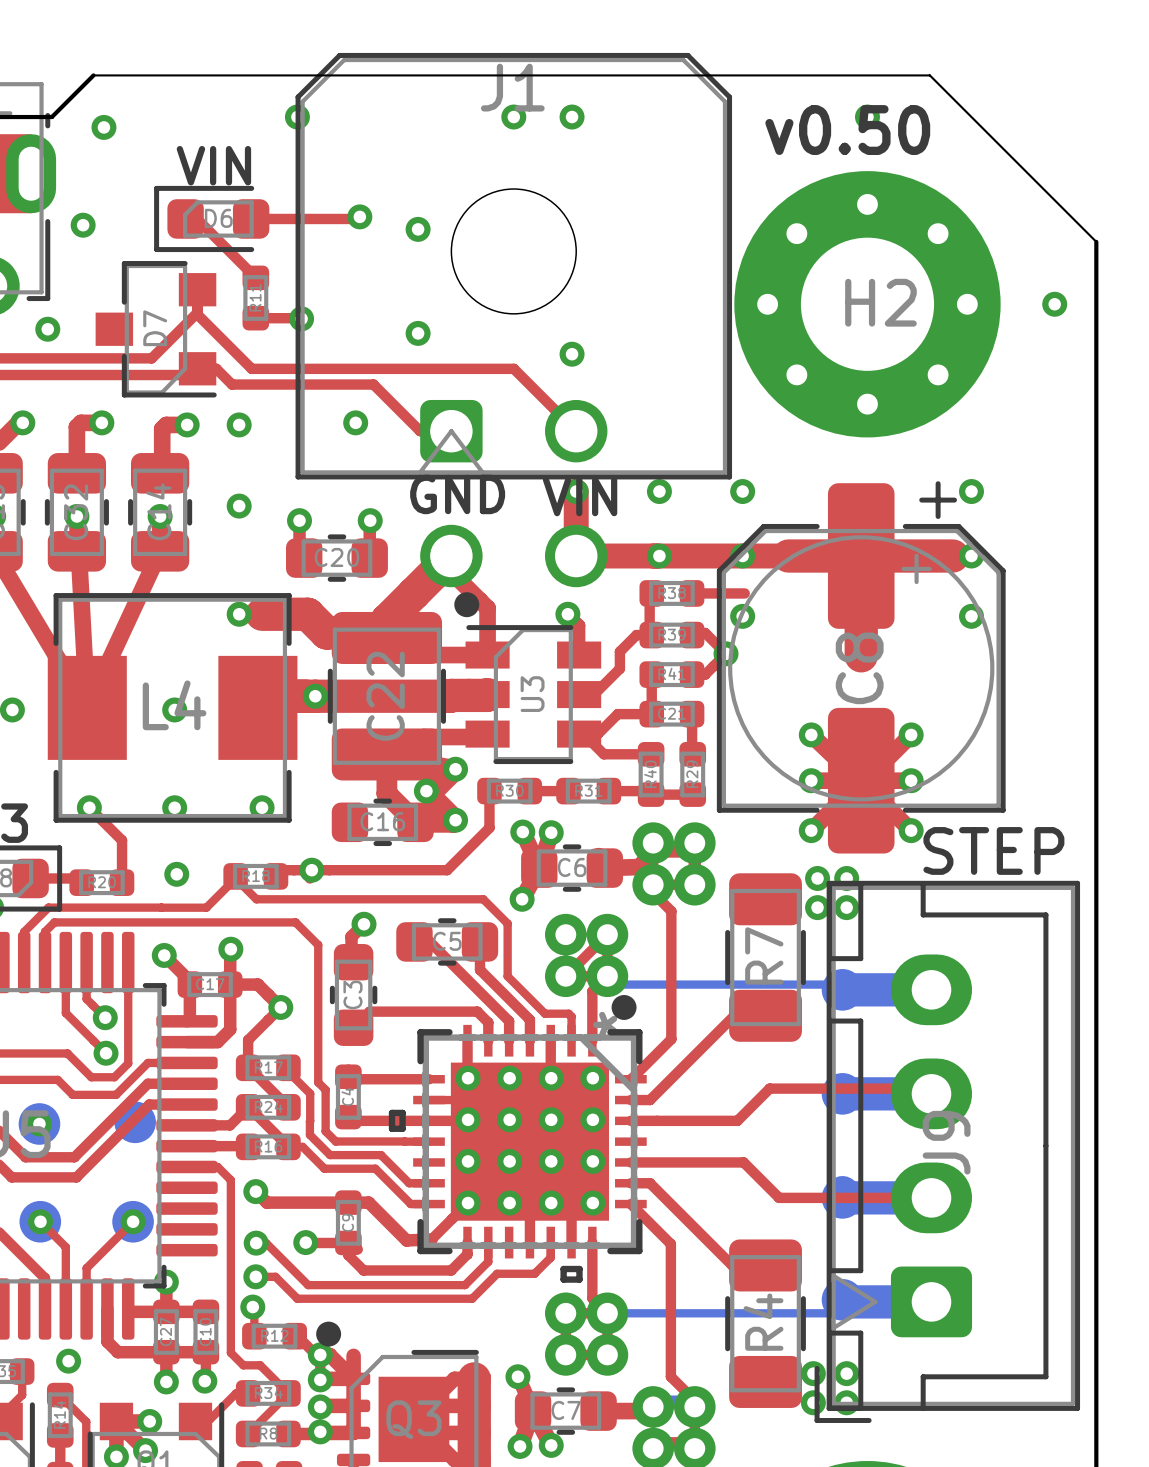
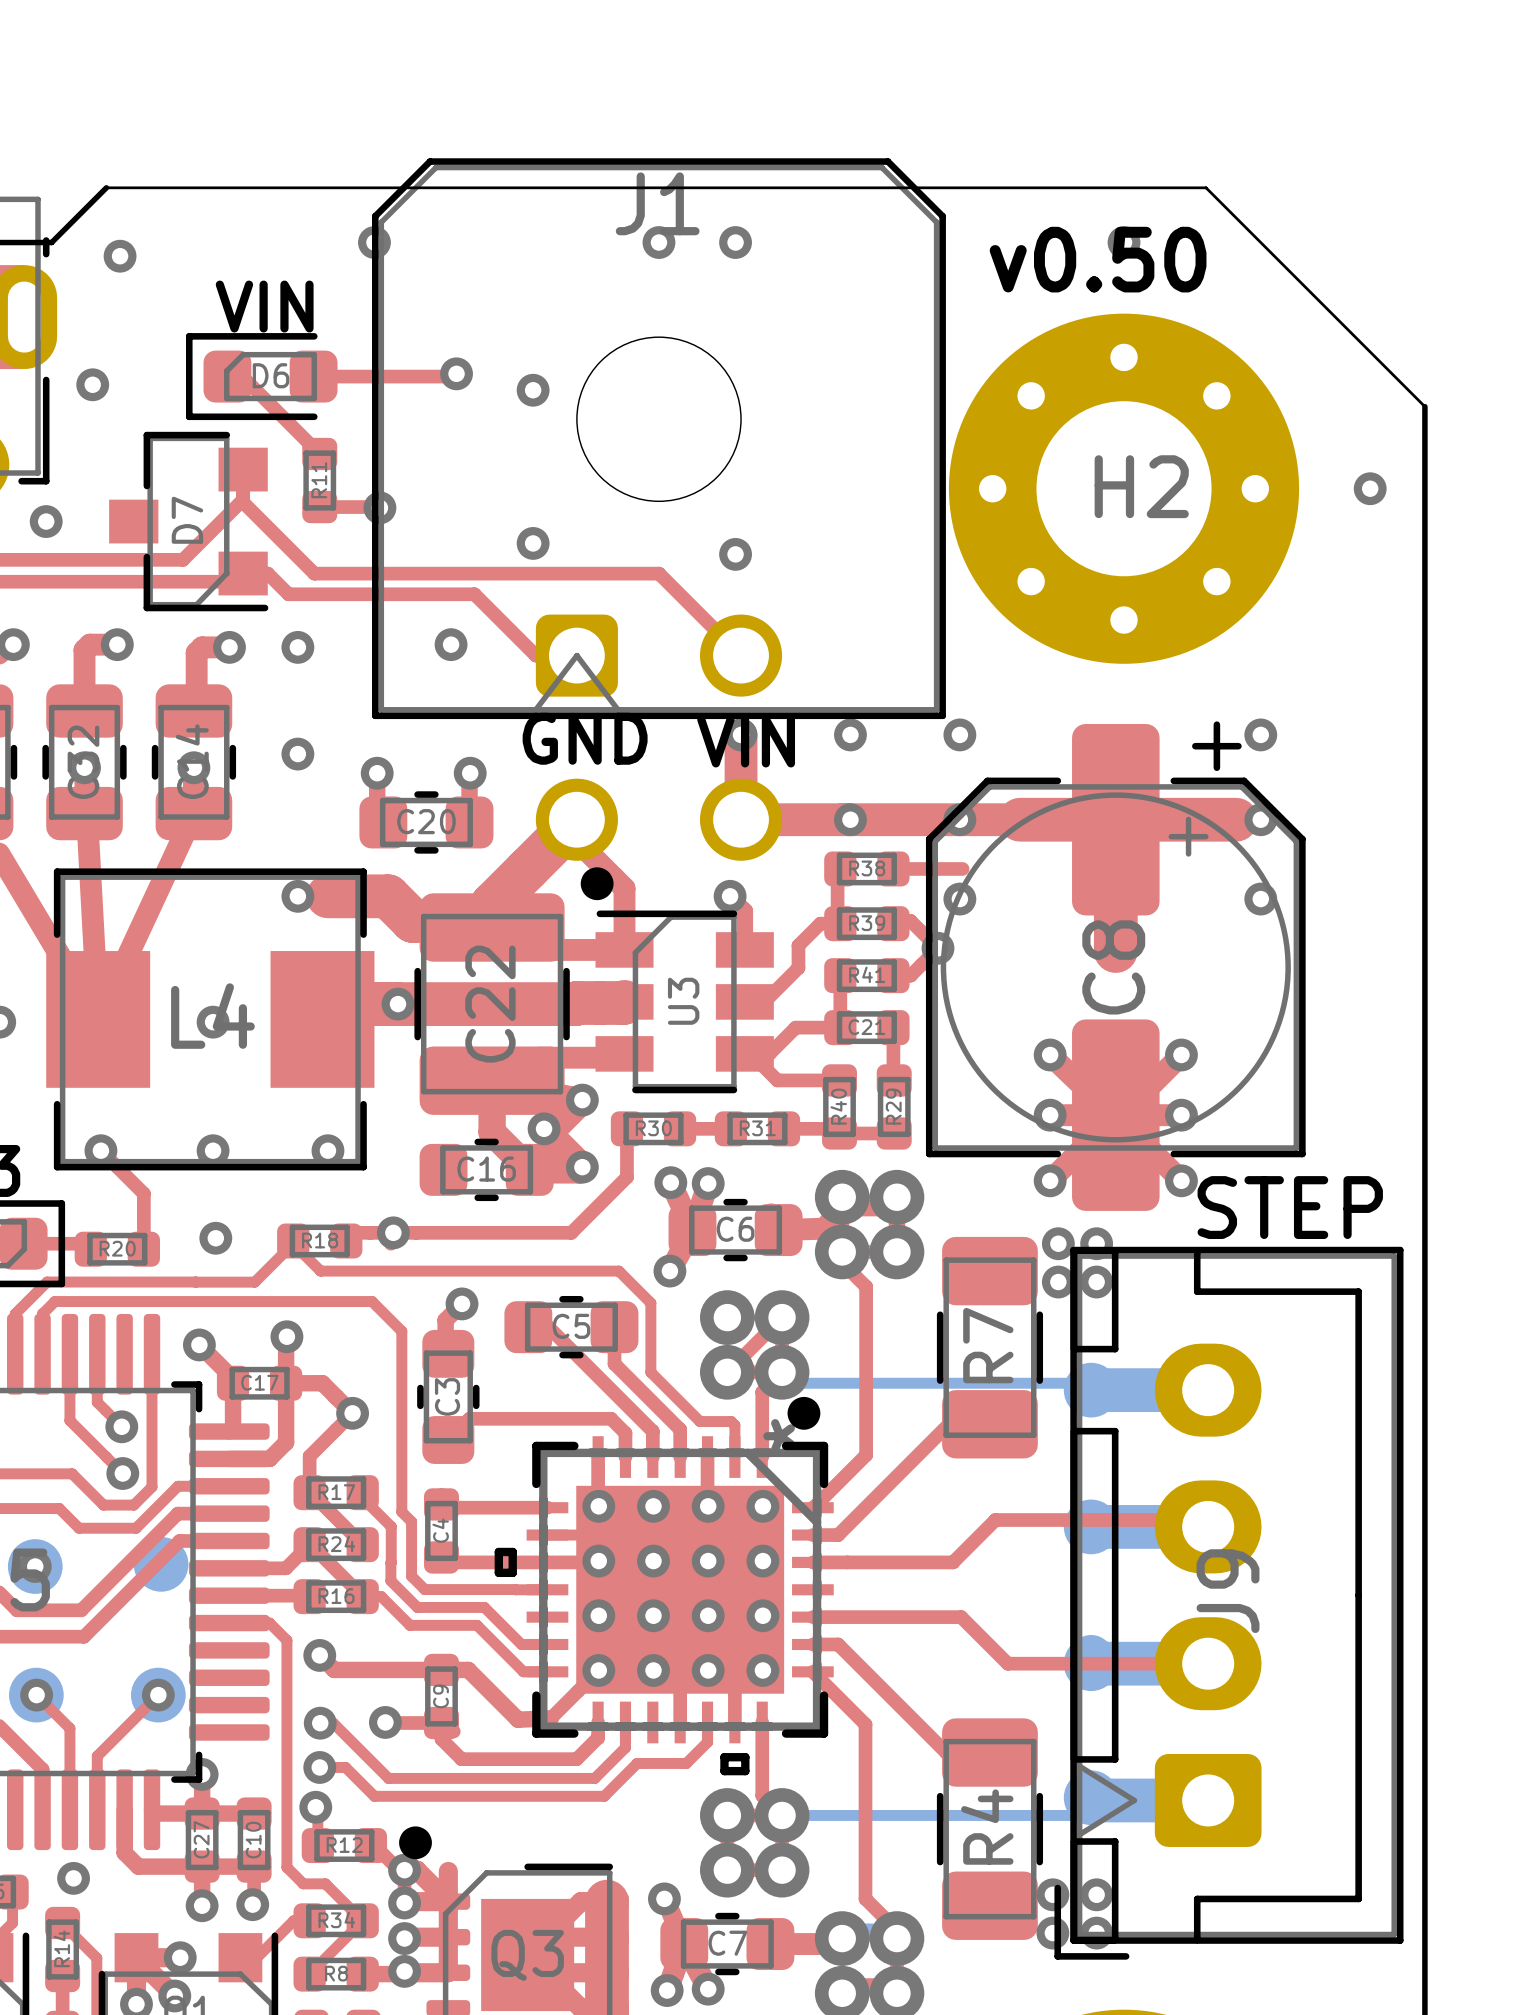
via position: (418, 333) -> (533, 543)

